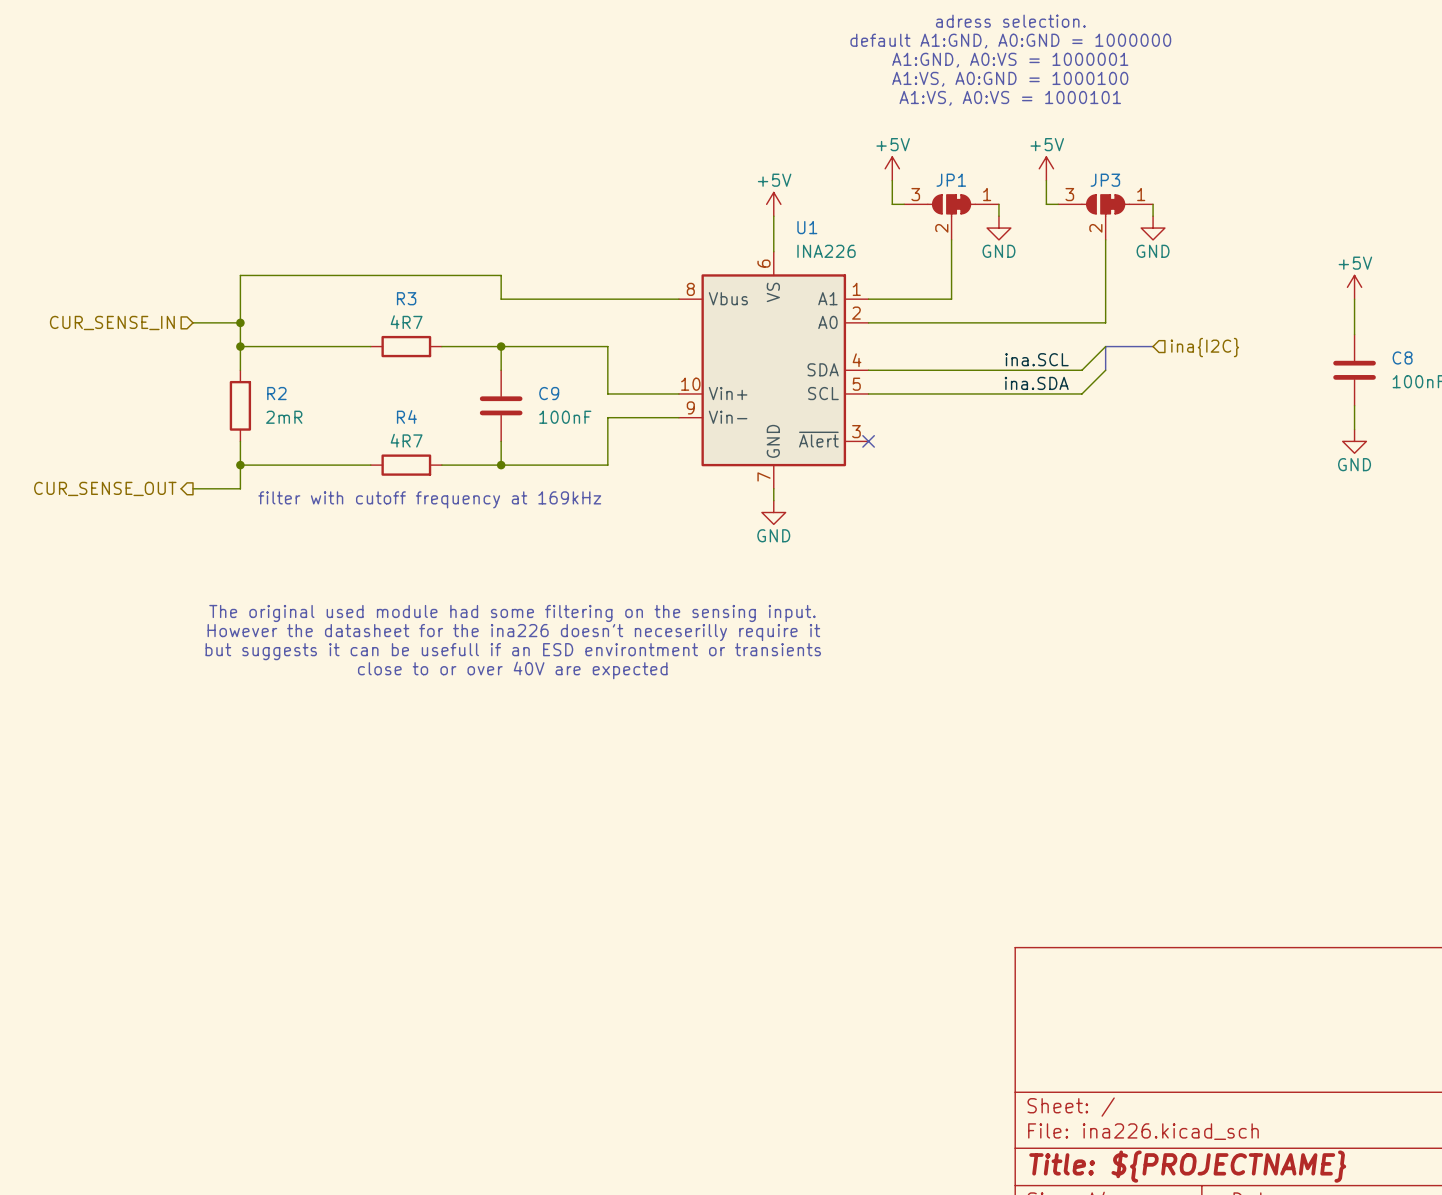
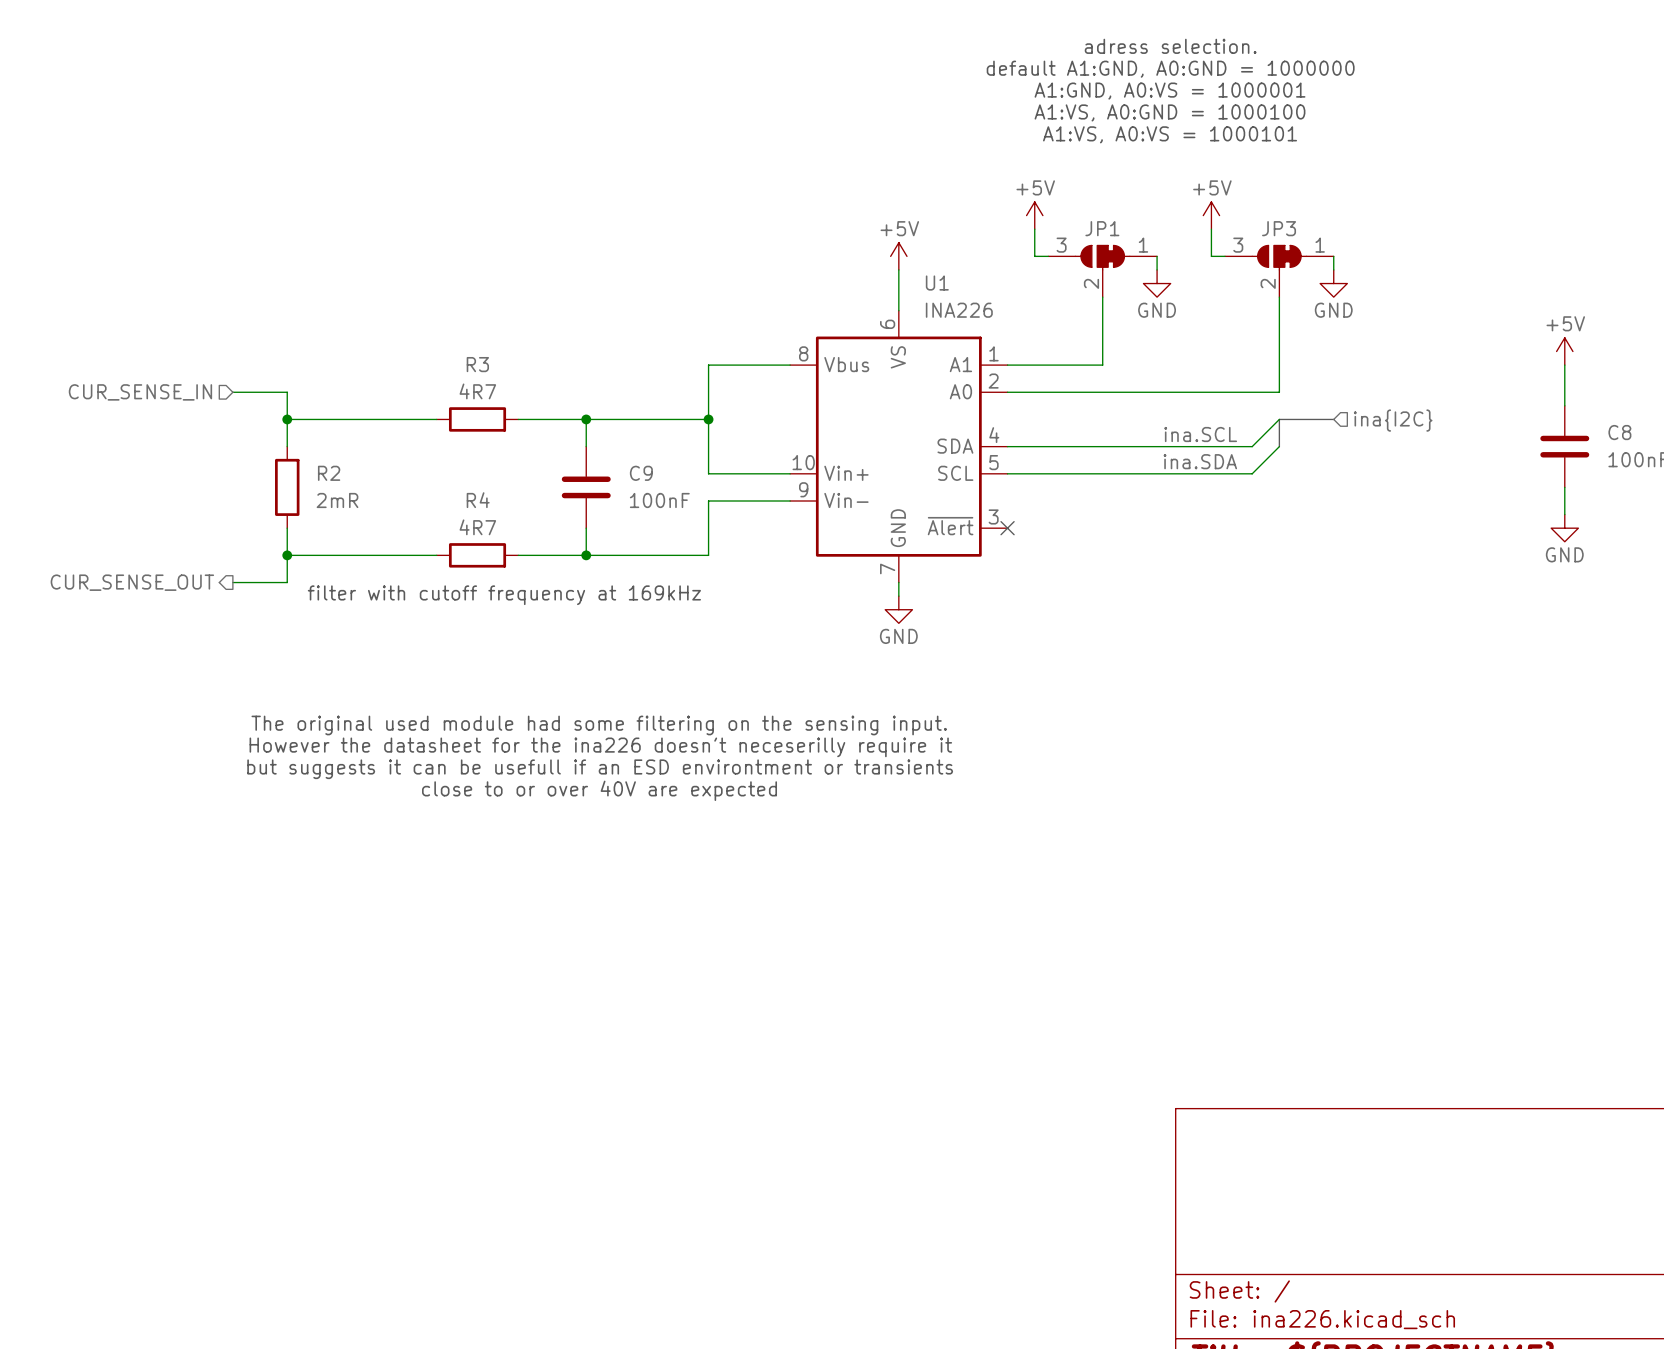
wire: (607, 299) (501, 299) (501, 275) (240, 275) (240, 322) -> (708, 365) (708, 419)
junction: (240, 322) -> none
junction: none -> (708, 419)

